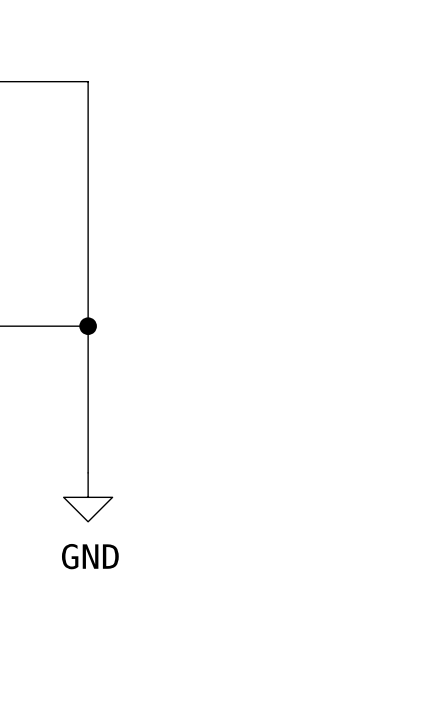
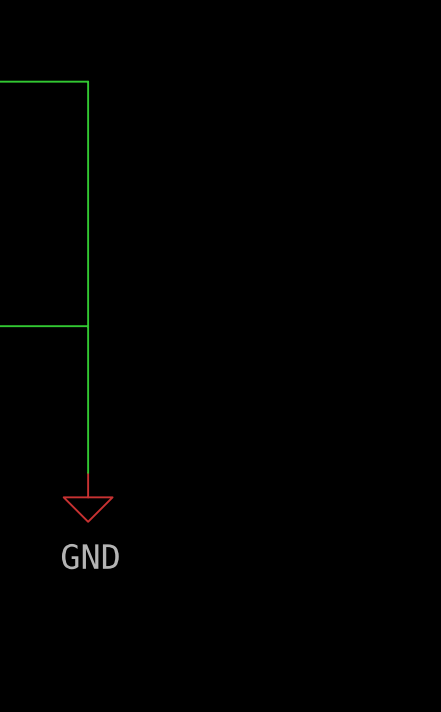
junction: (88, 326) -> none

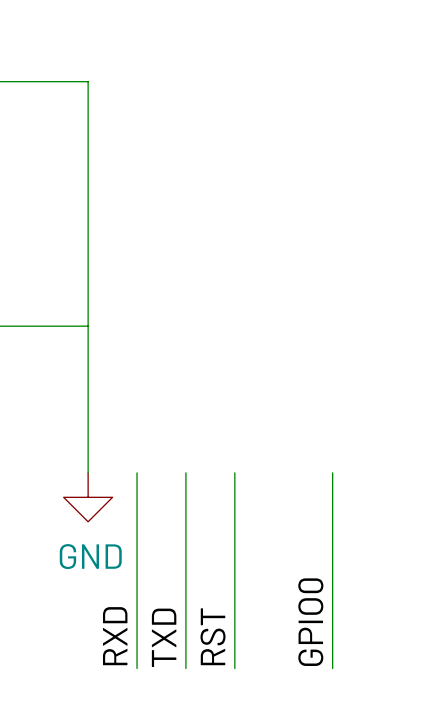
wire: none -> (137, 472) (137, 668)
wire: none -> (185, 472) (185, 668)
wire: none -> (234, 472) (234, 668)
wire: none -> (332, 472) (332, 668)
label: none -> GPIO0 (310, 622)
label: none -> RST (213, 636)
label: none -> RXD (115, 636)
label: none -> TXD (164, 637)

